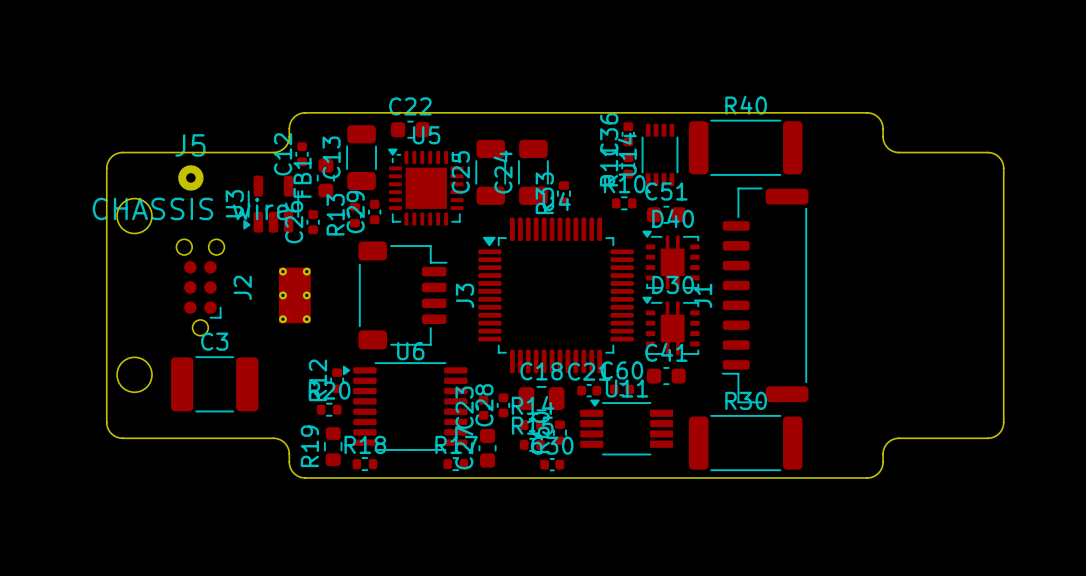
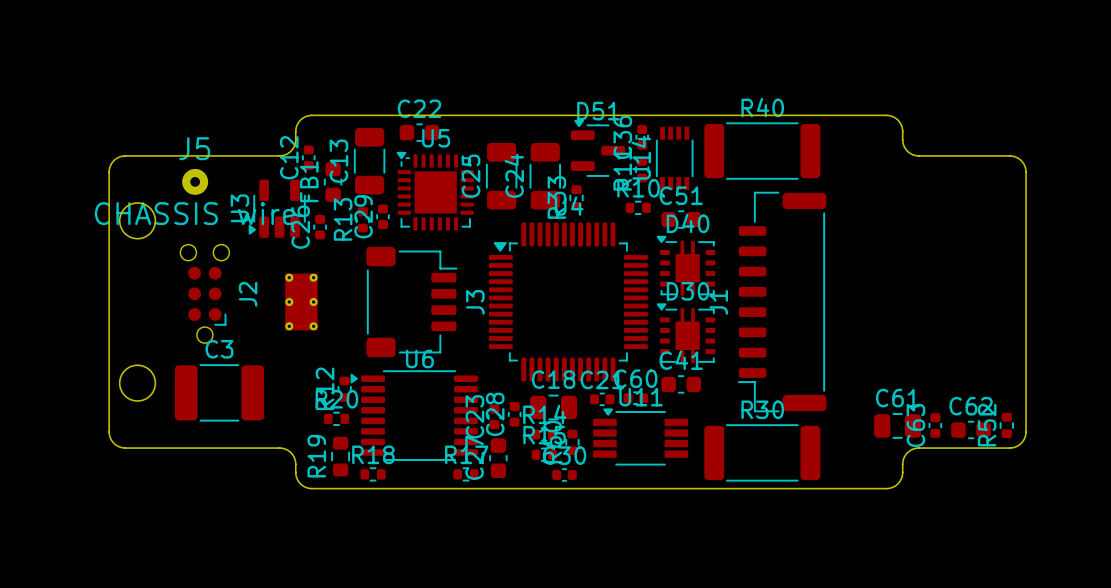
D51: none -> (598, 148)
C61: none -> (897, 425)
C63: none -> (935, 425)
R52: none -> (1006, 425)
C62: none -> (971, 430)

